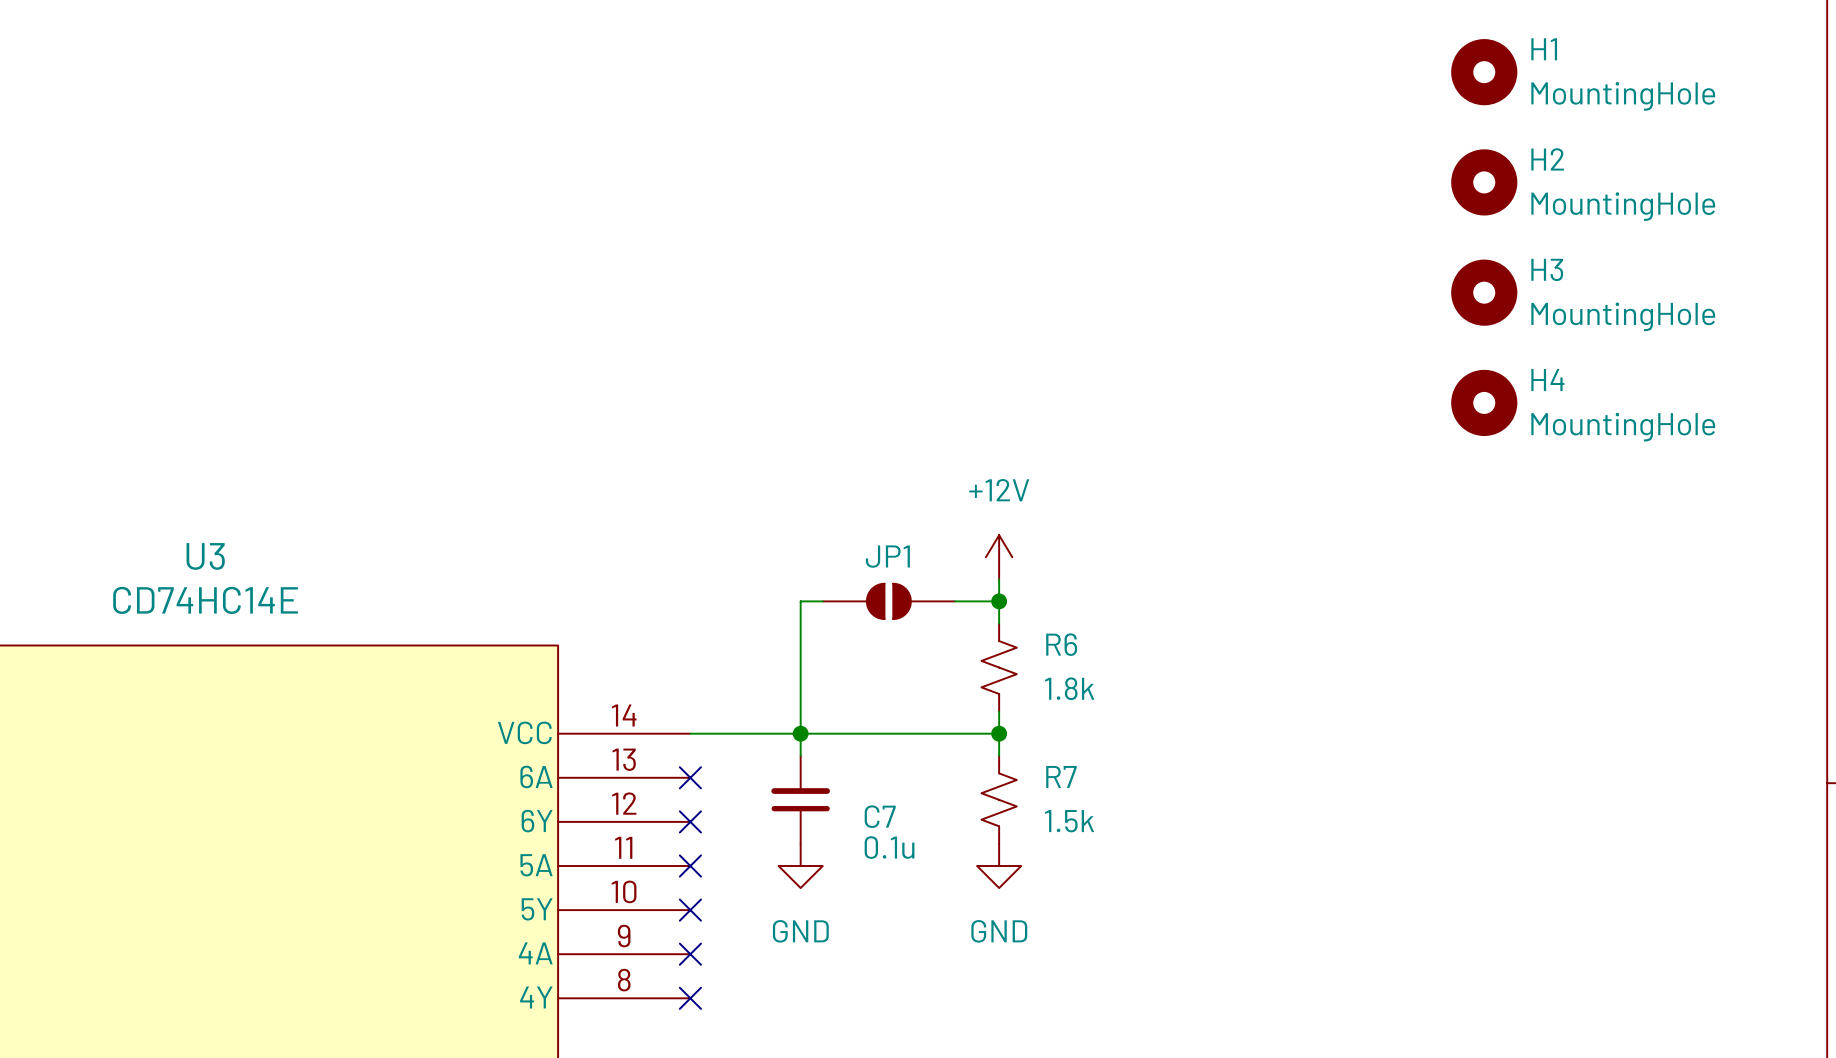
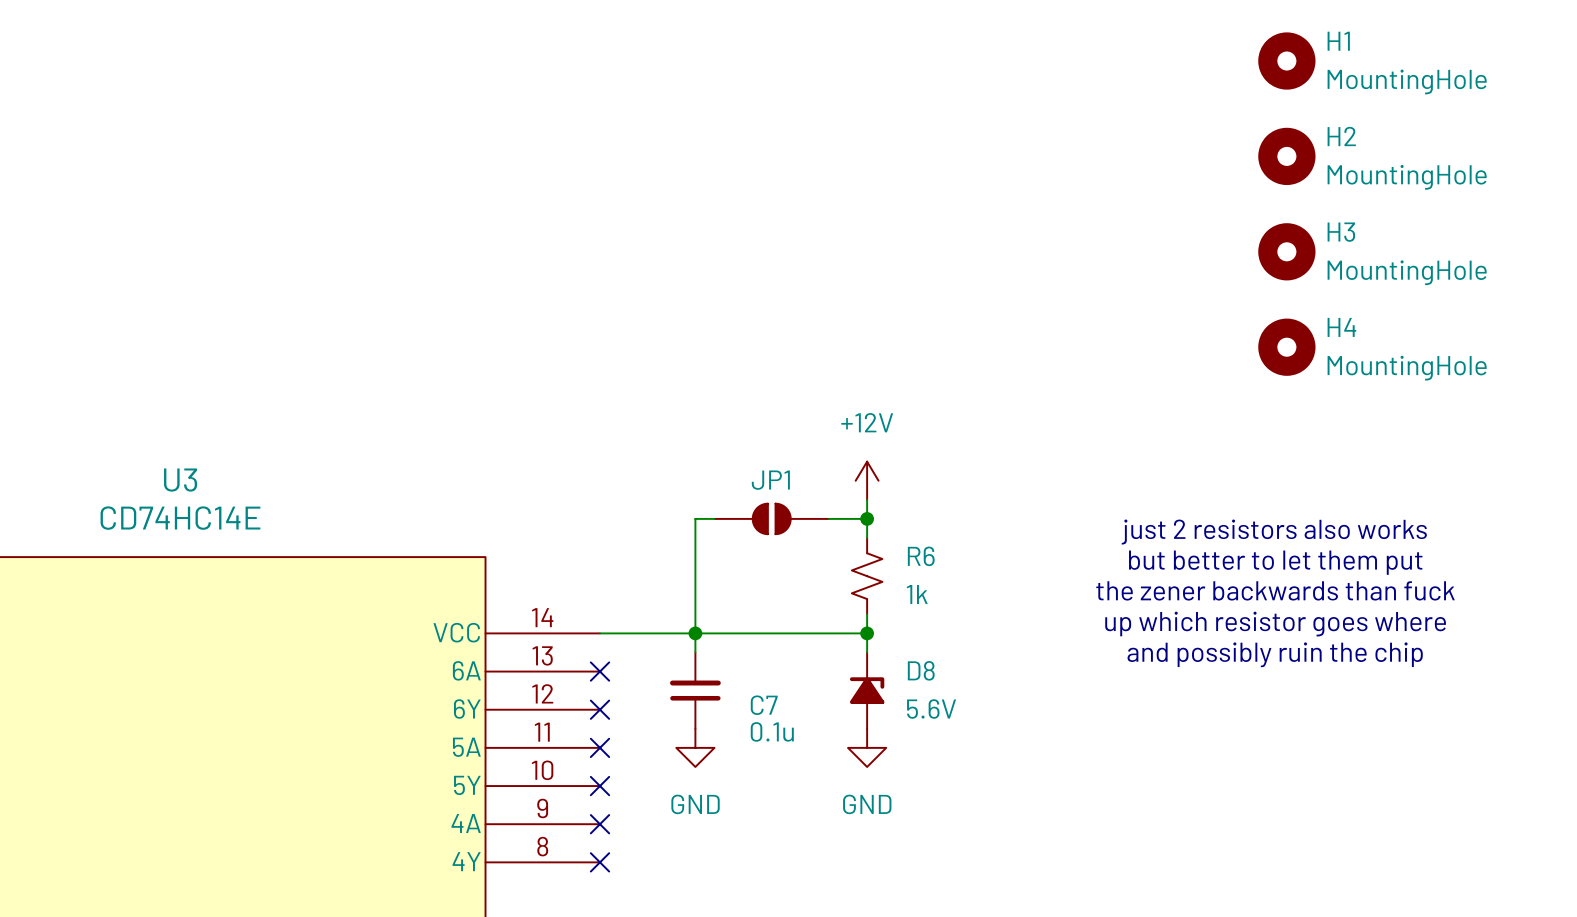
text: none -> just 2 resistors also works (1274, 532)
text: none -> but better to let them put (1275, 562)
text: none -> the zener backwards than fuck (1275, 590)
R6 value: 1.8k (1069, 688) -> 1k (917, 594)
text: none -> up which resistor goes where (1275, 624)
text: none -> and possibly ruin the chip (1275, 654)
R7: 1.5k (999, 799) -> none
D8: none -> 5.6V (867, 690)

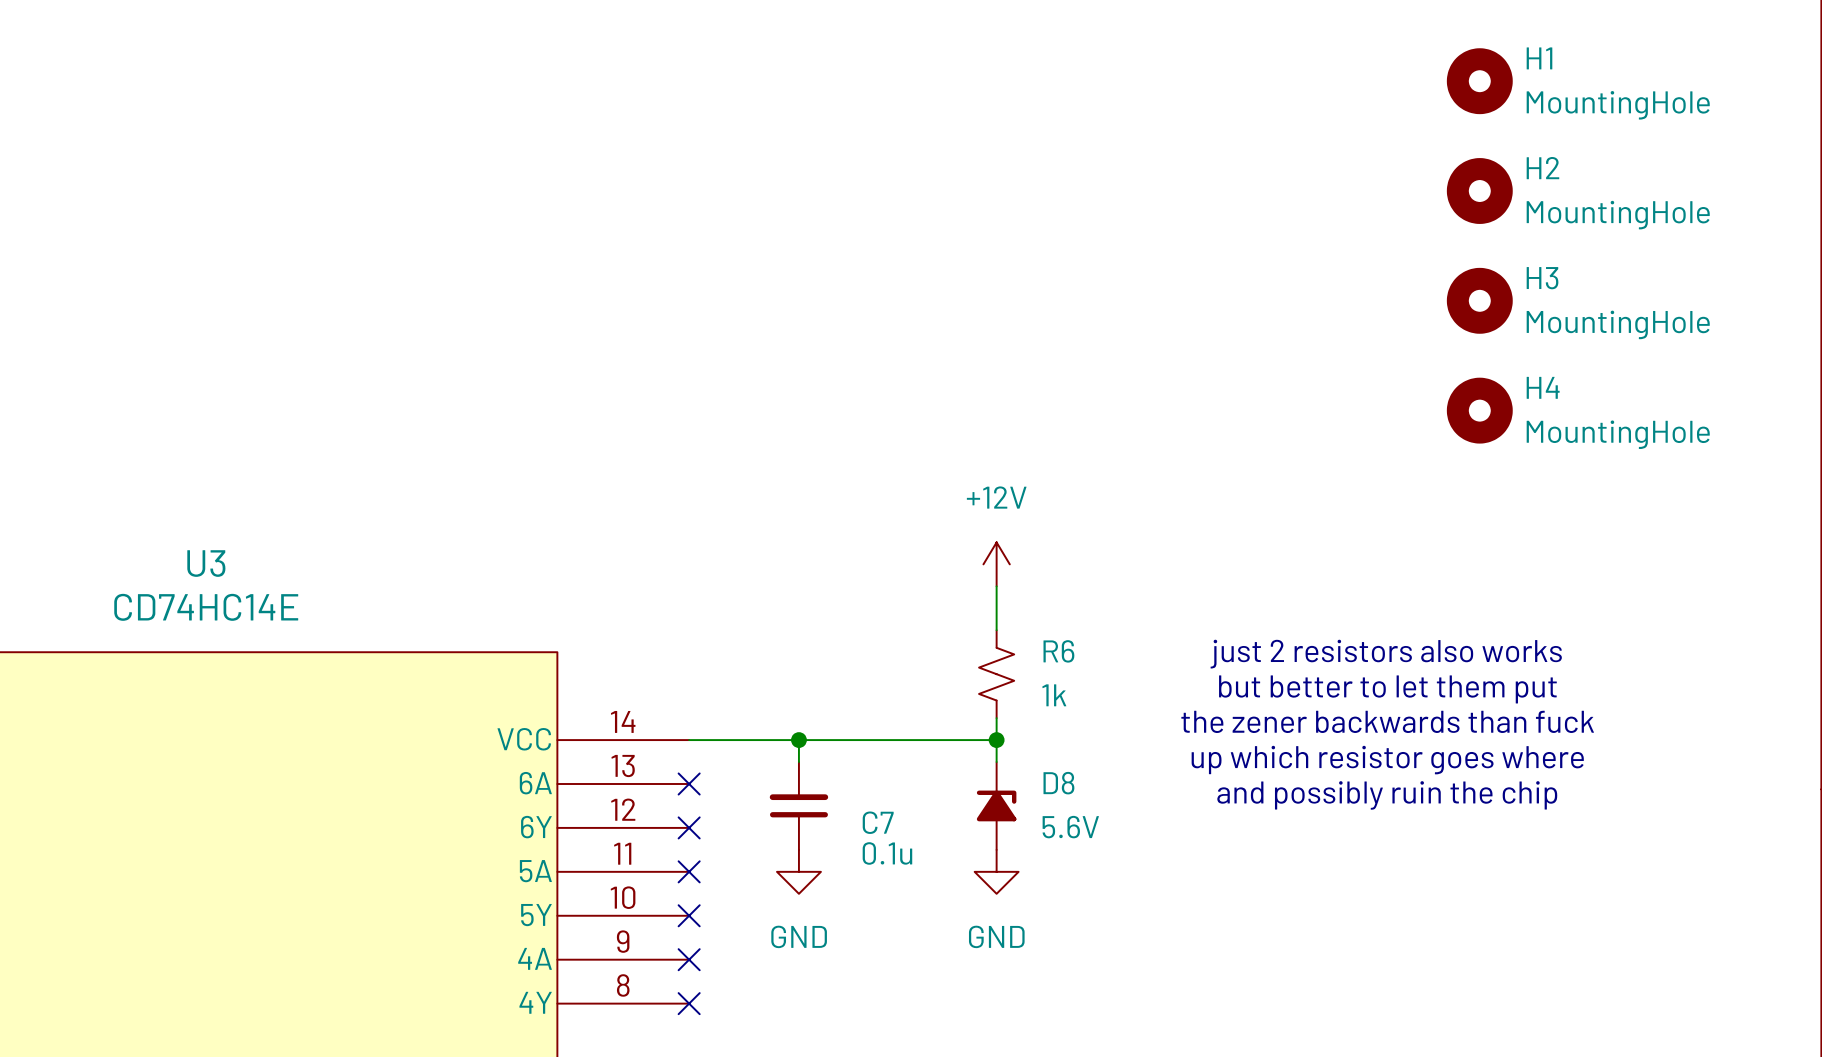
wire: (714, 518) (695, 518) (695, 633) -> none
JP1: (771, 518) -> none
wire: (828, 518) (867, 518) -> none
junction: (867, 518) -> none
text position: just 2 resistors also works (1274, 532) -> just 2 resistors also works (1386, 654)
text position: but better to let them put (1275, 562) -> but better to let them put (1387, 689)
text position: the zener backwards than fuck (1275, 590) -> the zener backwards than fuck (1387, 721)
text position: up which resistor goes where (1275, 624) -> up which resistor goes where (1387, 760)
text position: and possibly ruin the chip (1275, 654) -> and possibly ruin the chip (1387, 795)

